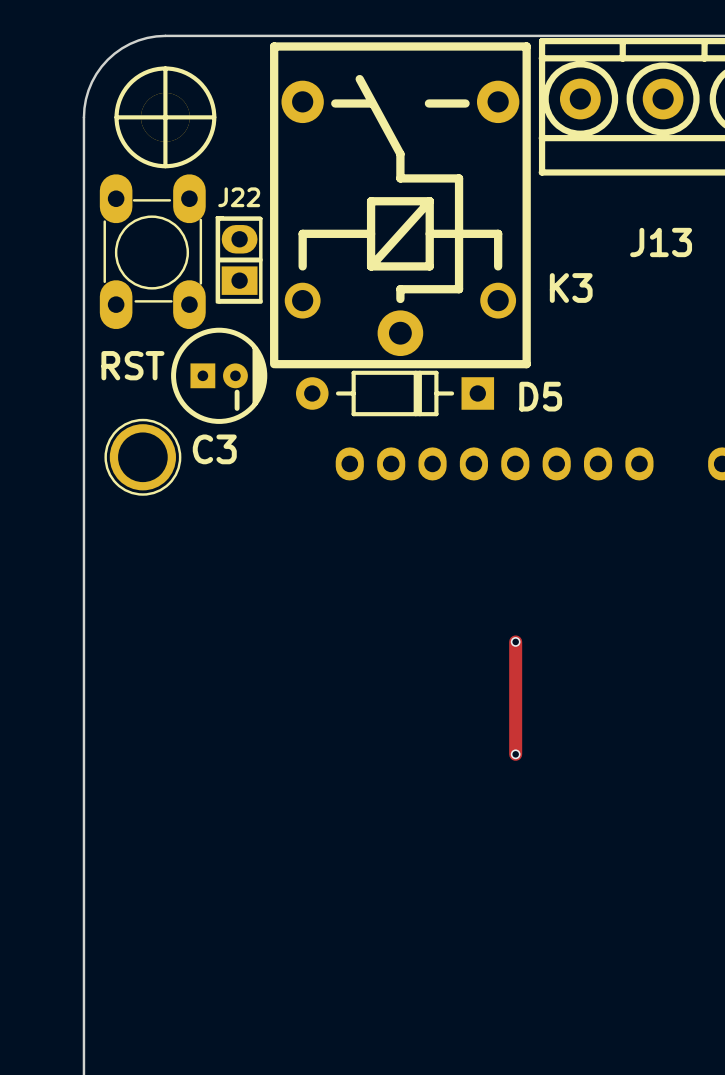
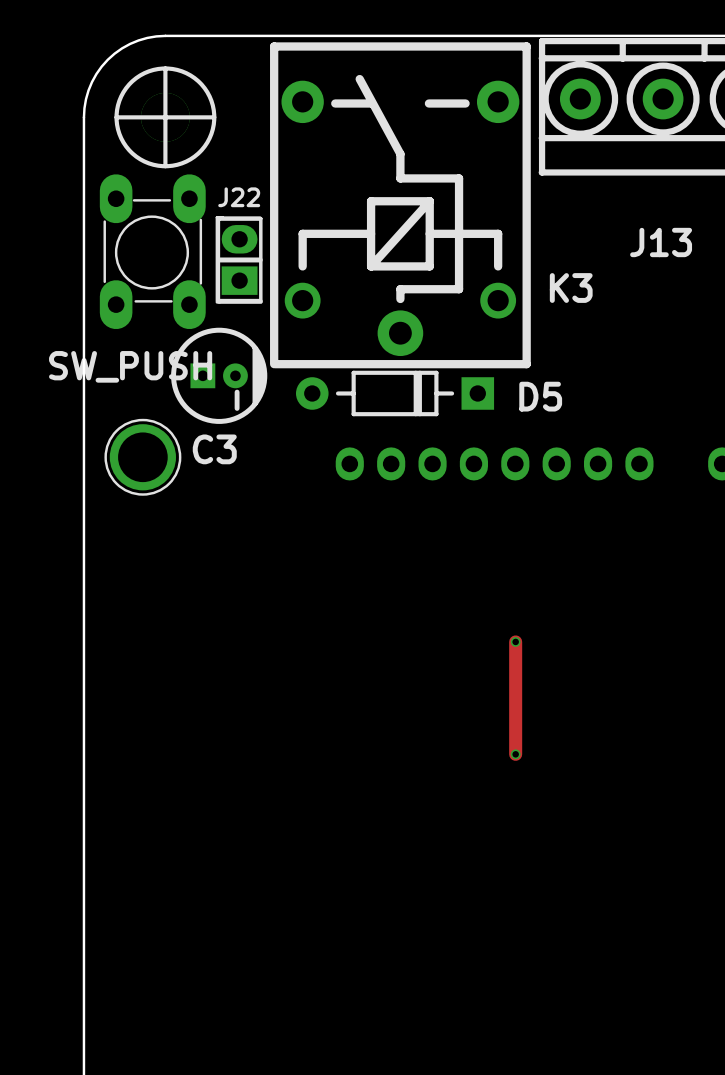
part value: RST (132, 365) -> SW_PUSH (130, 366)

